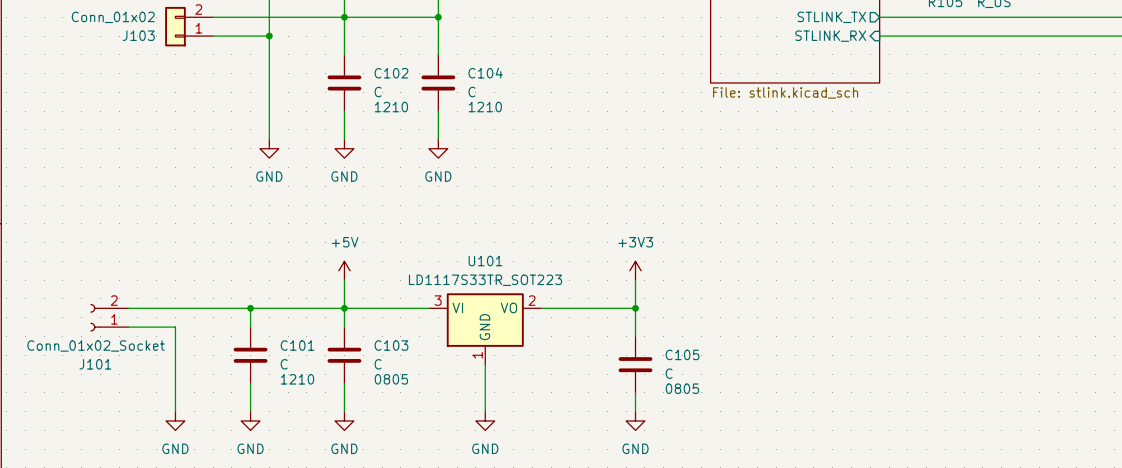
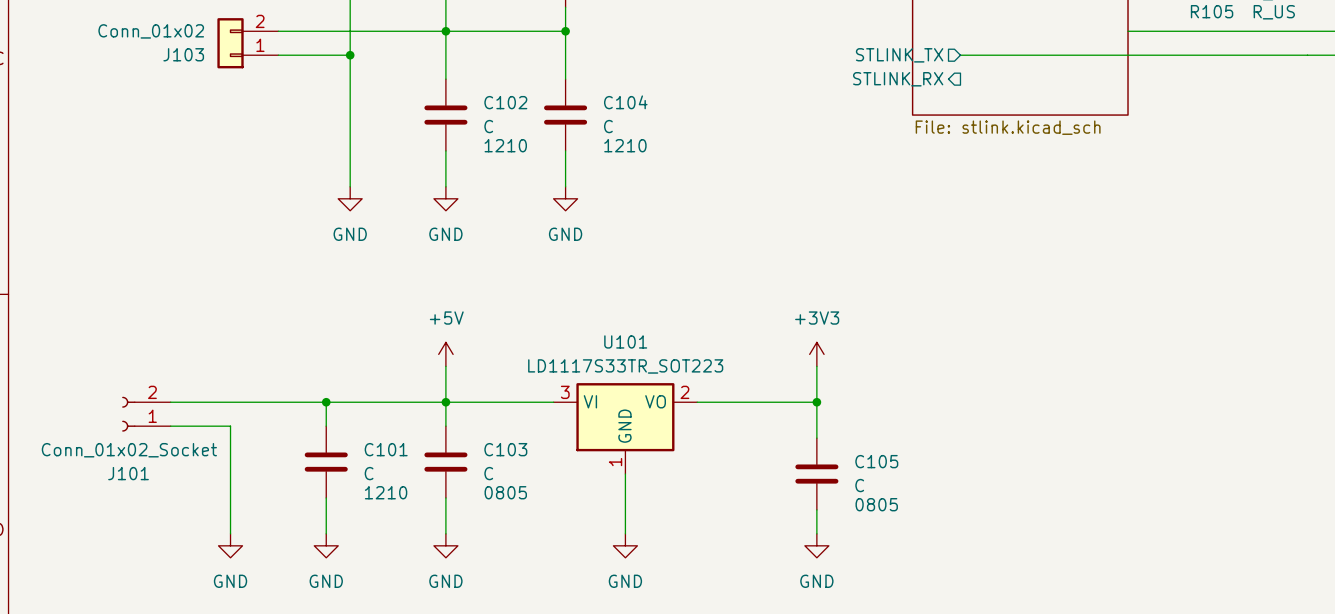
sheet pin position: STLINK_TX (831, 17) -> STLINK_TX (899, 55)
wire: none -> (960, 55) (1128, 55)
sheet pin position: STLINK_RX (830, 36) -> STLINK_RX (898, 79)

